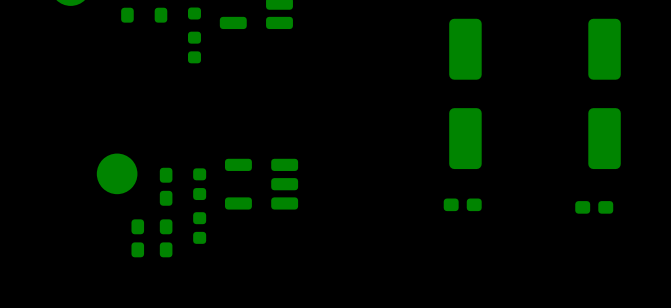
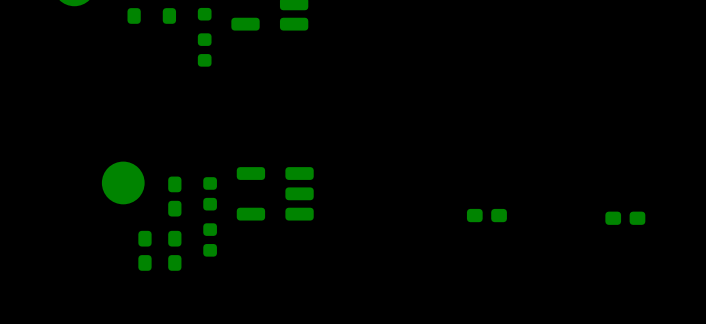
part: (465, 93) -> none
part: (604, 93) -> none

